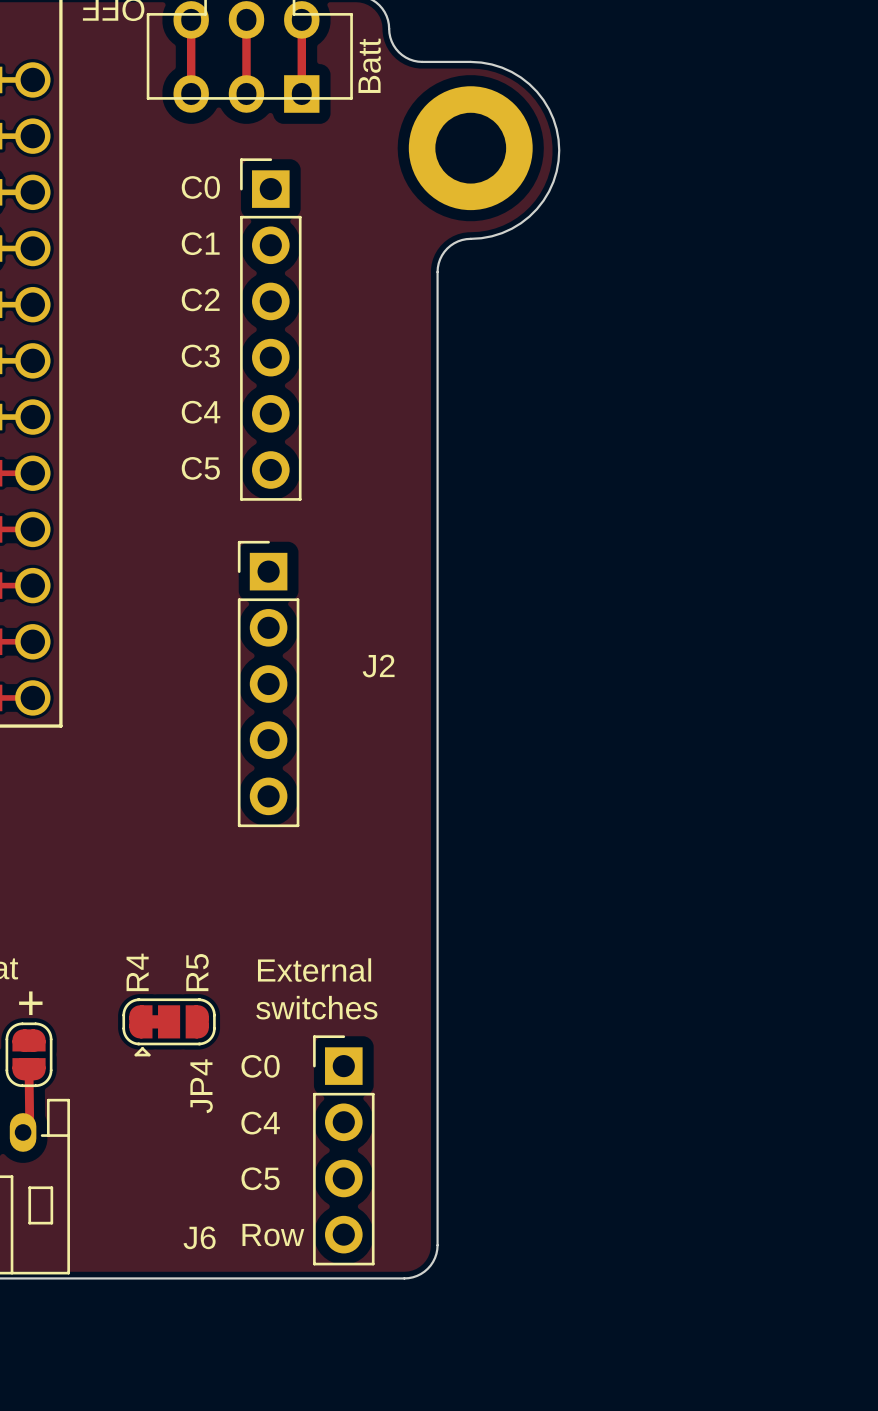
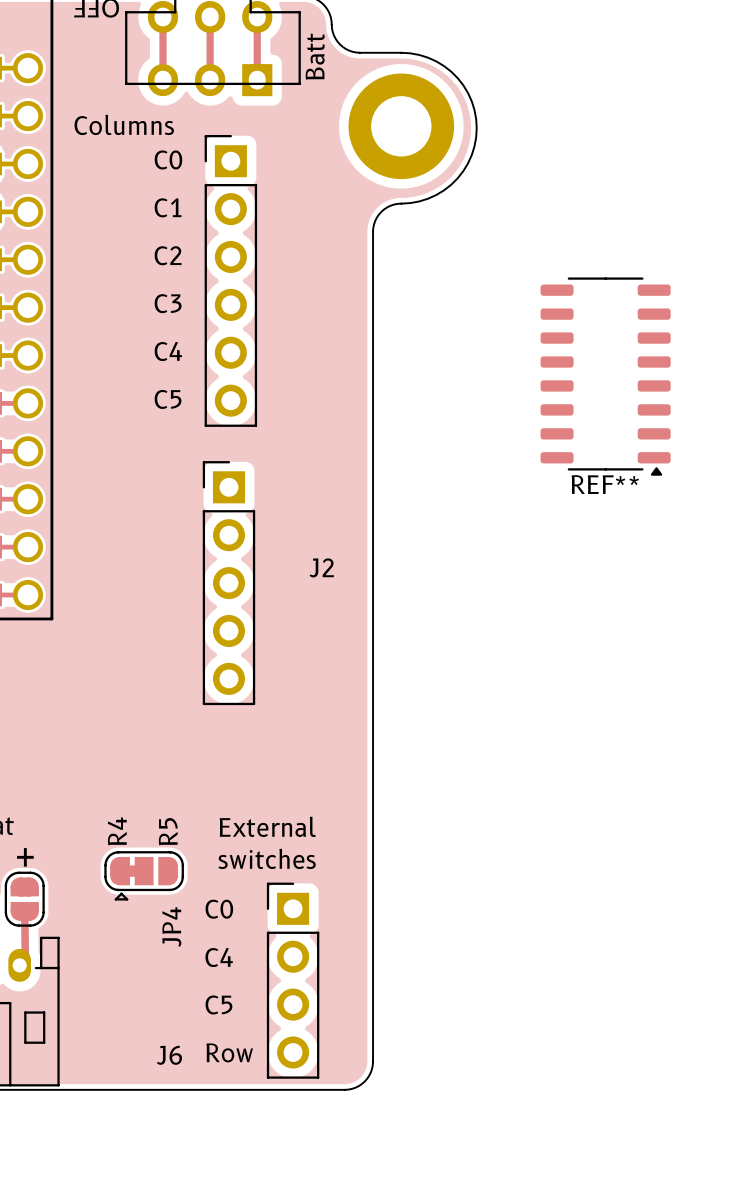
part text: none -> Columns (124, 124)
REF**: none -> (605, 376)

